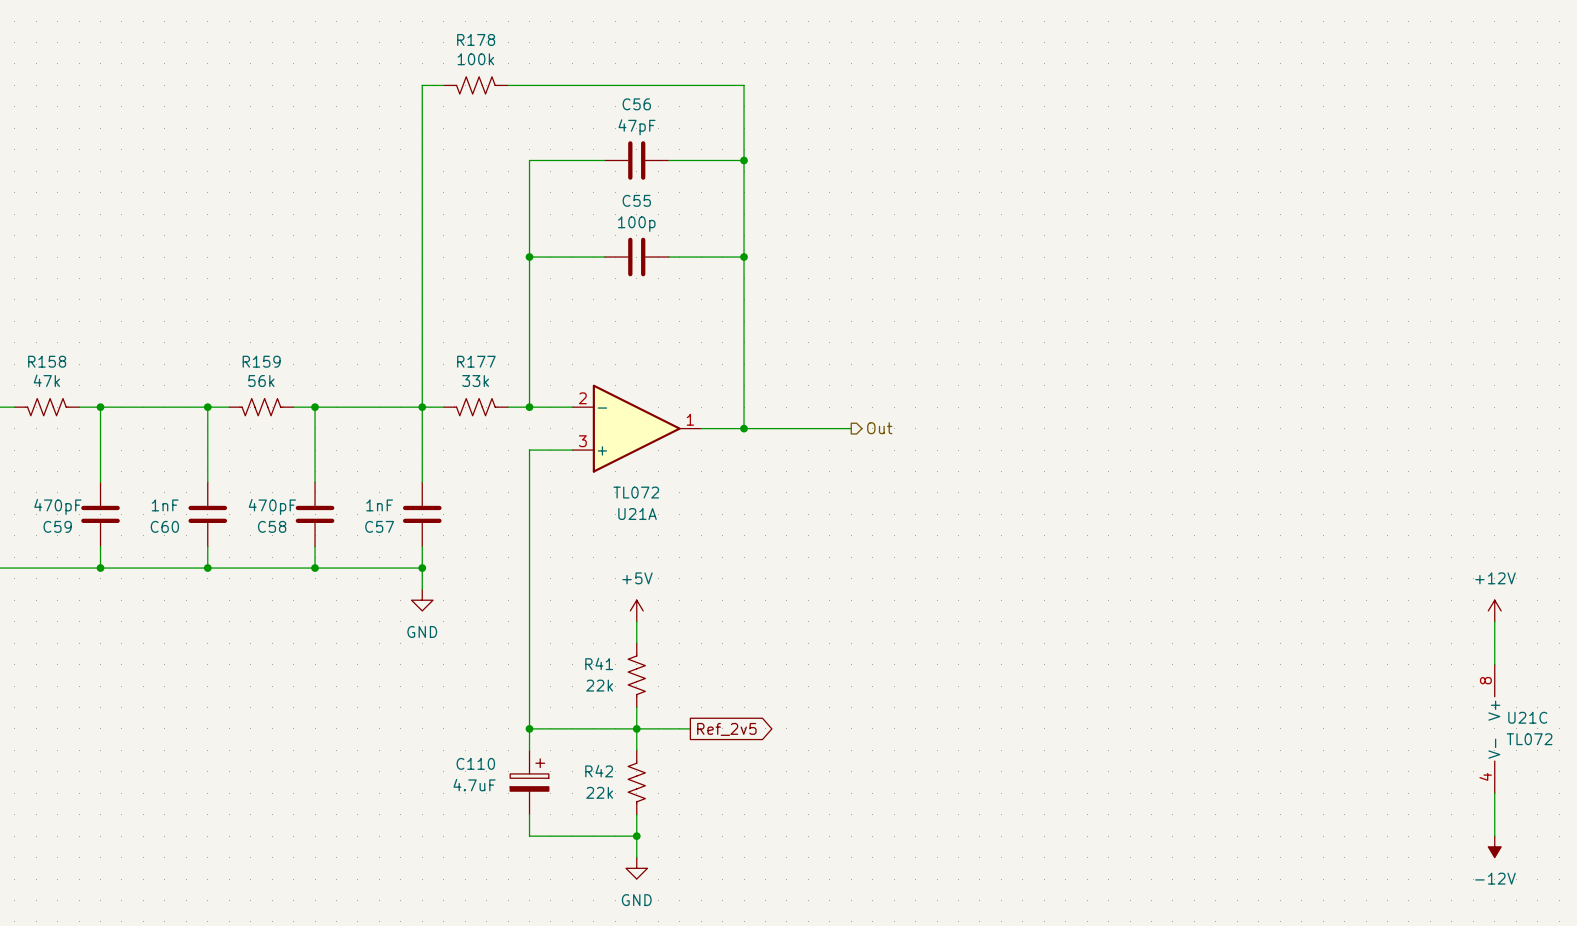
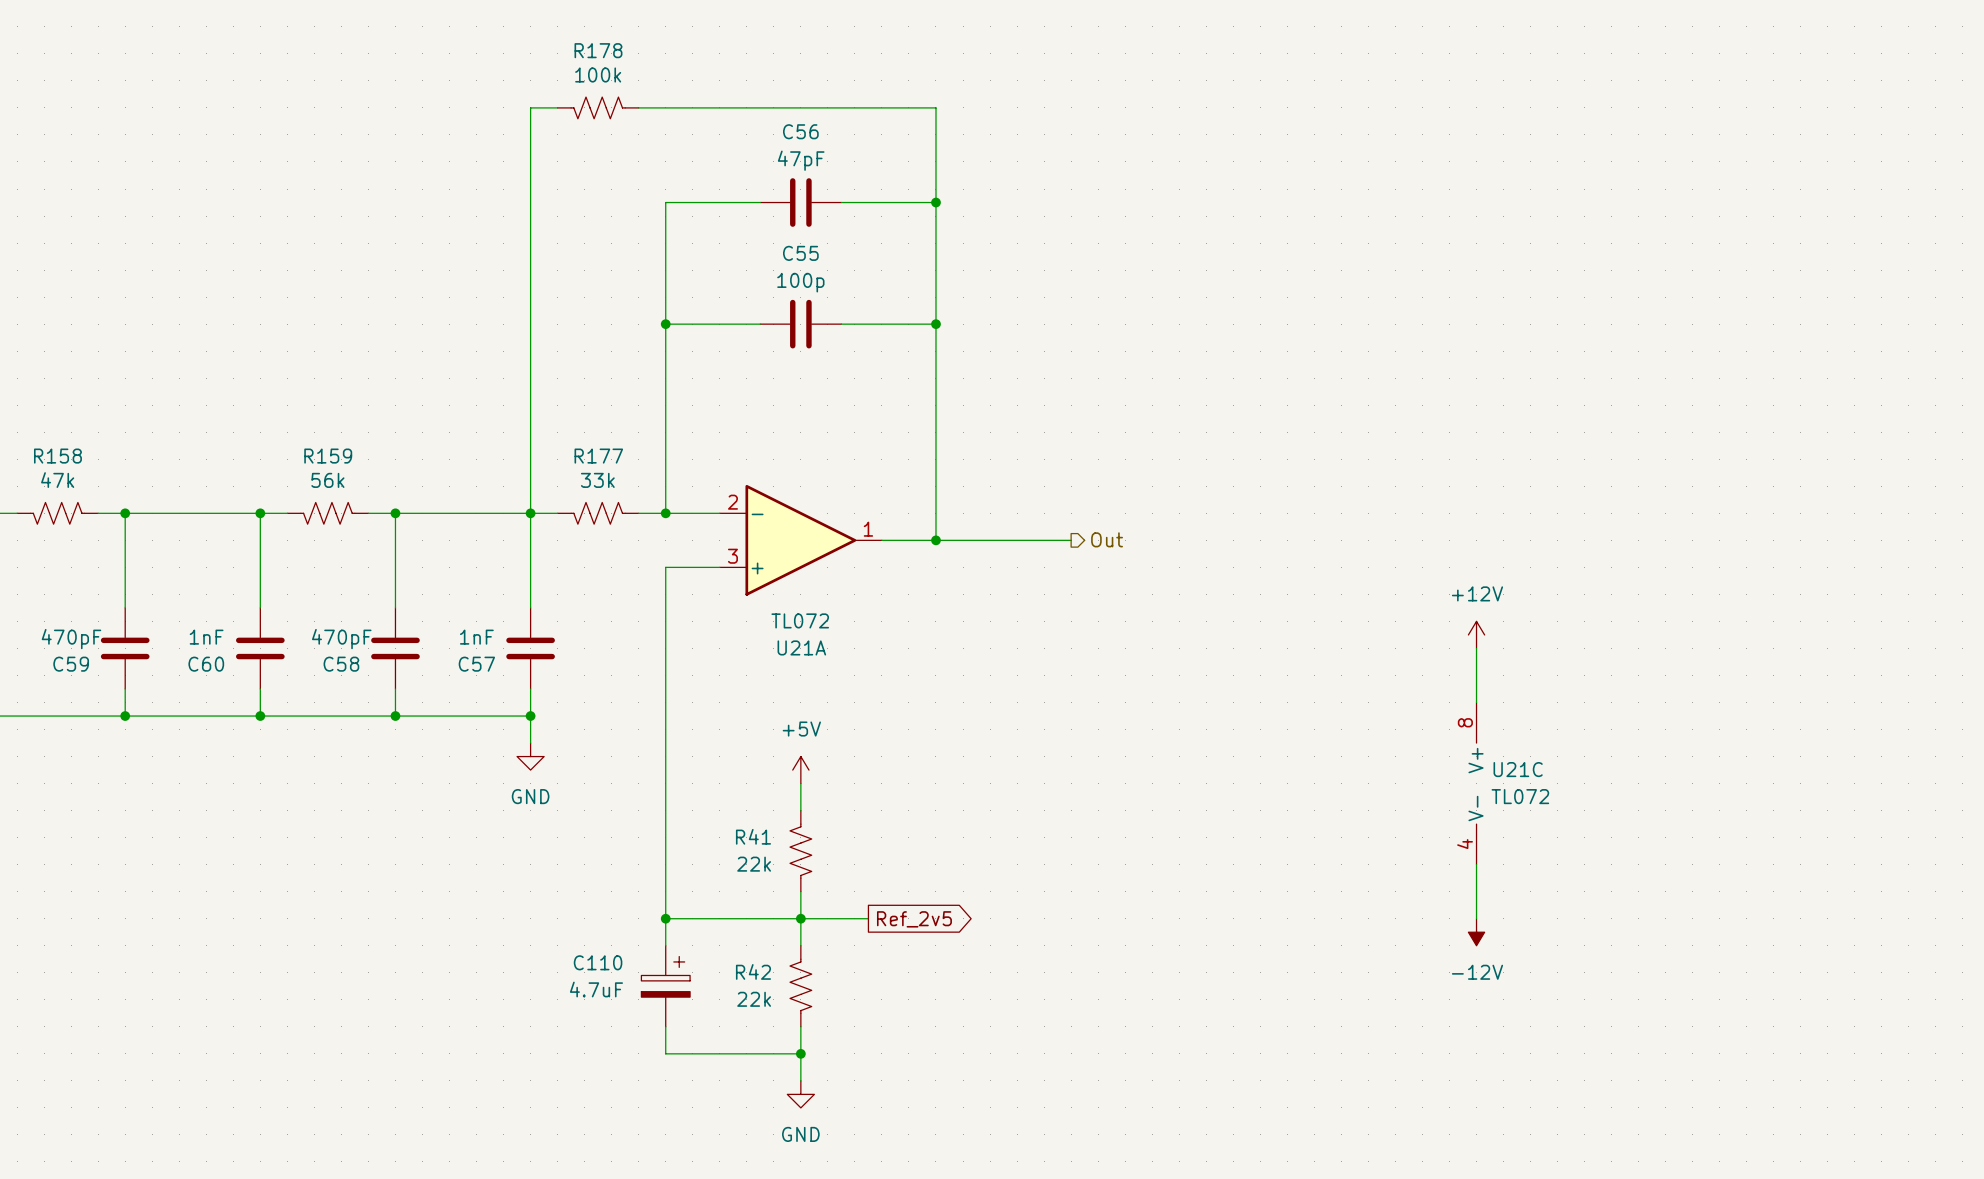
power symbol: none -> +12V (1476, 634)
wire: none -> (1476, 648) (1476, 702)
power symbol: +12V (1494, 610) -> none
wire: (1494, 621) (1494, 664) -> none
wire: none -> (1476, 864) (1476, 918)
U21C position: (1494, 728) -> (1476, 783)
power symbol: none -> -12V (1476, 932)
wire: (1494, 793) (1494, 836) -> none
power symbol: -12V (1494, 846) -> none

